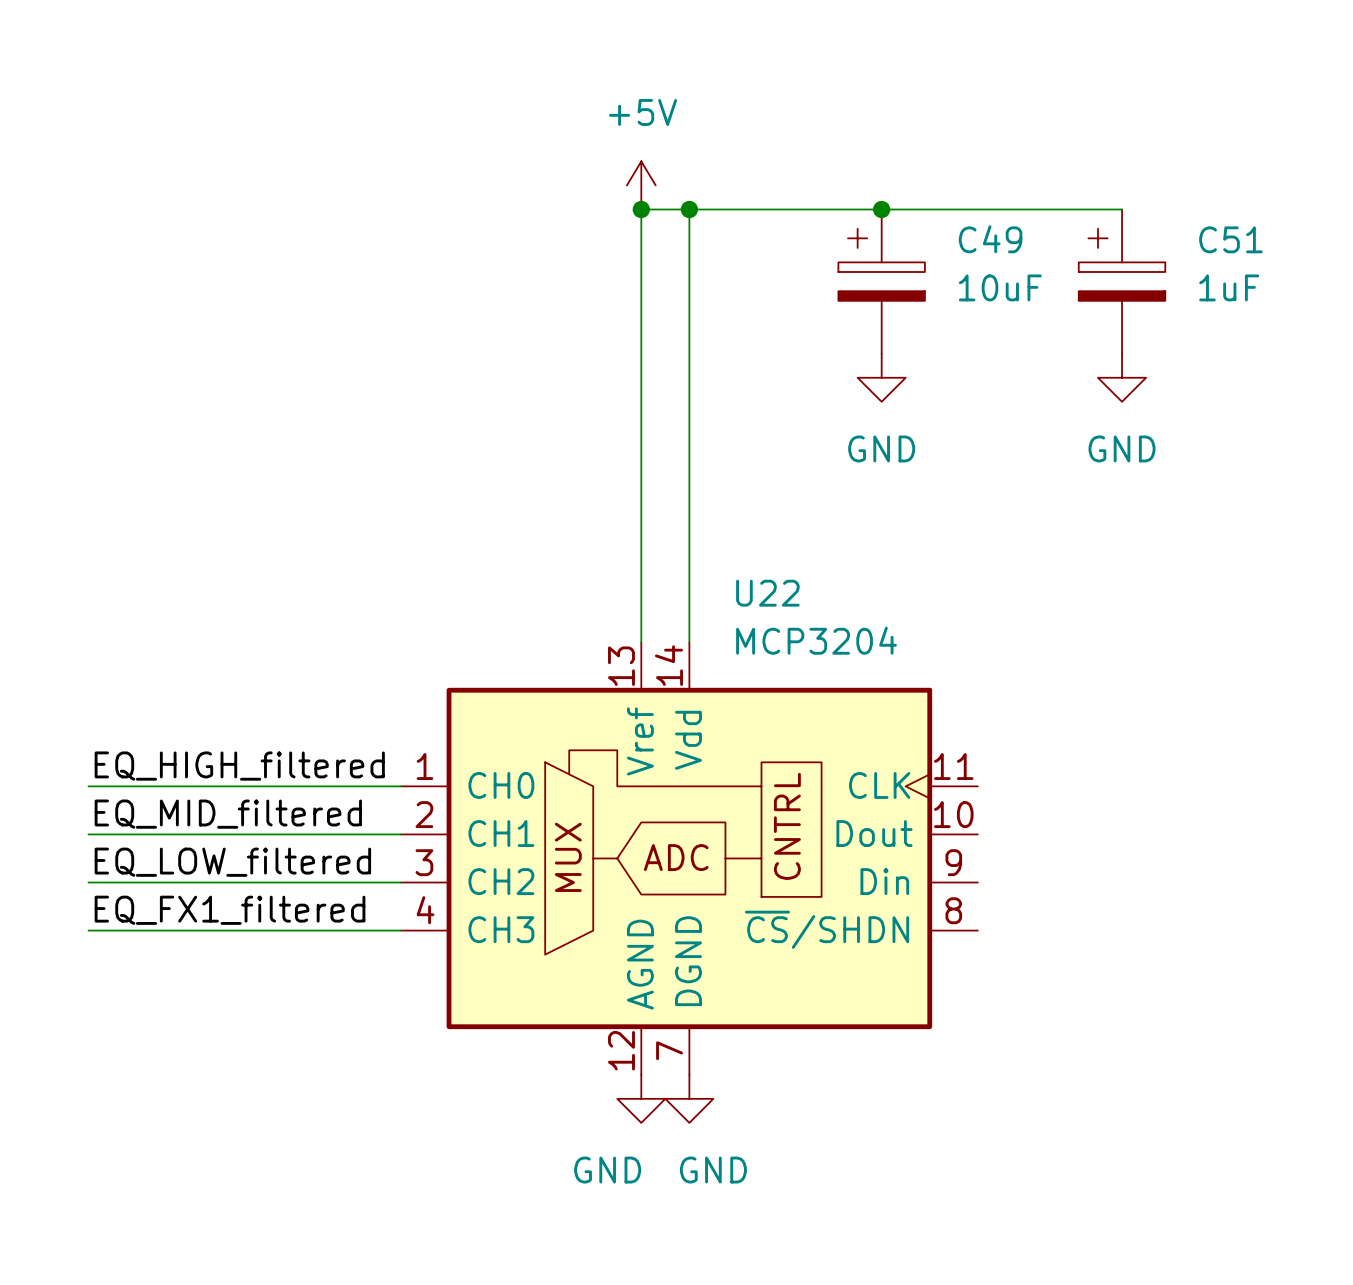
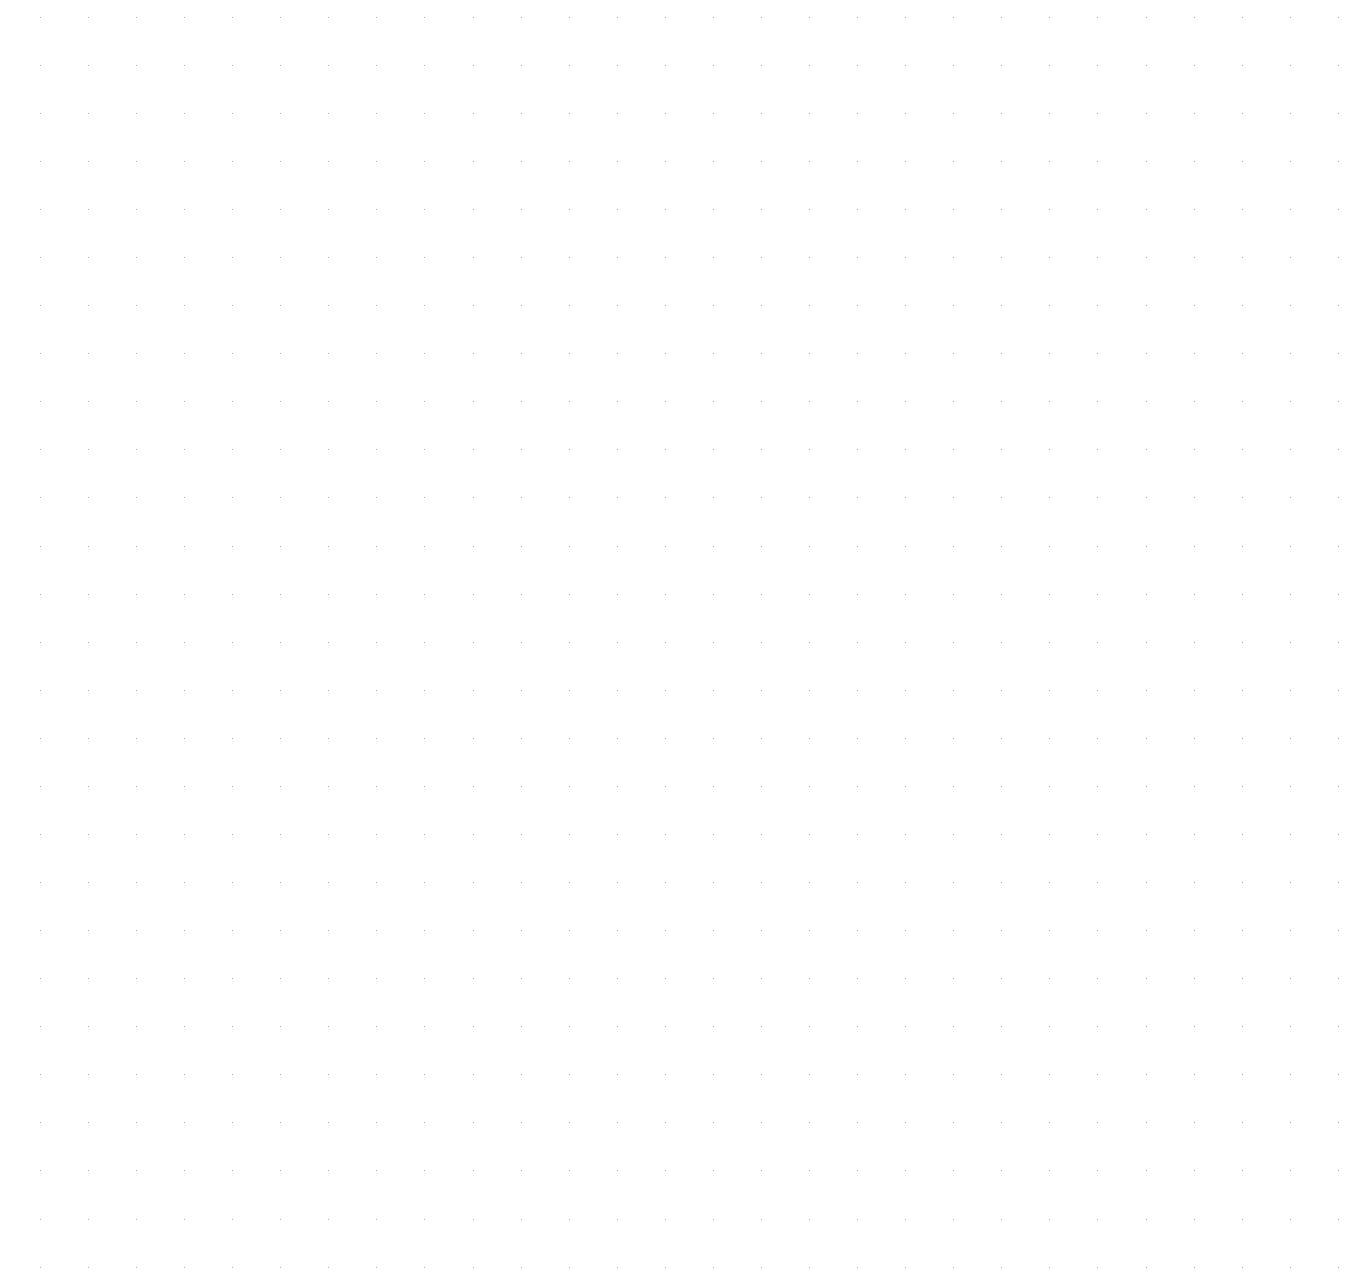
power symbol: +5V (641, 185) -> none
junction: (641, 209) -> none
wire: (689, 209) (689, 642) -> none
junction: (689, 209) -> none
junction: (881, 209) -> none
wire: (1122, 209) (641, 209) (641, 642) -> none
C49: 10uF (881, 281) -> none
C51: 1uF (1122, 281) -> none
power symbol: GND (881, 377) -> none
power symbol: GND (1122, 377) -> none
label: EQ_HIGH_filtered (239, 766) -> none
wire: (88, 786) (400, 786) -> none
label: EQ_MID_filtered (228, 814) -> none
wire: (88, 834) (400, 834) -> none
U22: MCP3204 (689, 858) -> none
label: EQ_LOW_filtered (232, 862) -> none
wire: (88, 882) (400, 882) -> none
label: EQ_FX1_filtered (230, 910) -> none
wire: (88, 930) (400, 930) -> none
power symbol: GND (641, 1098) -> none
power symbol: GND (689, 1098) -> none

